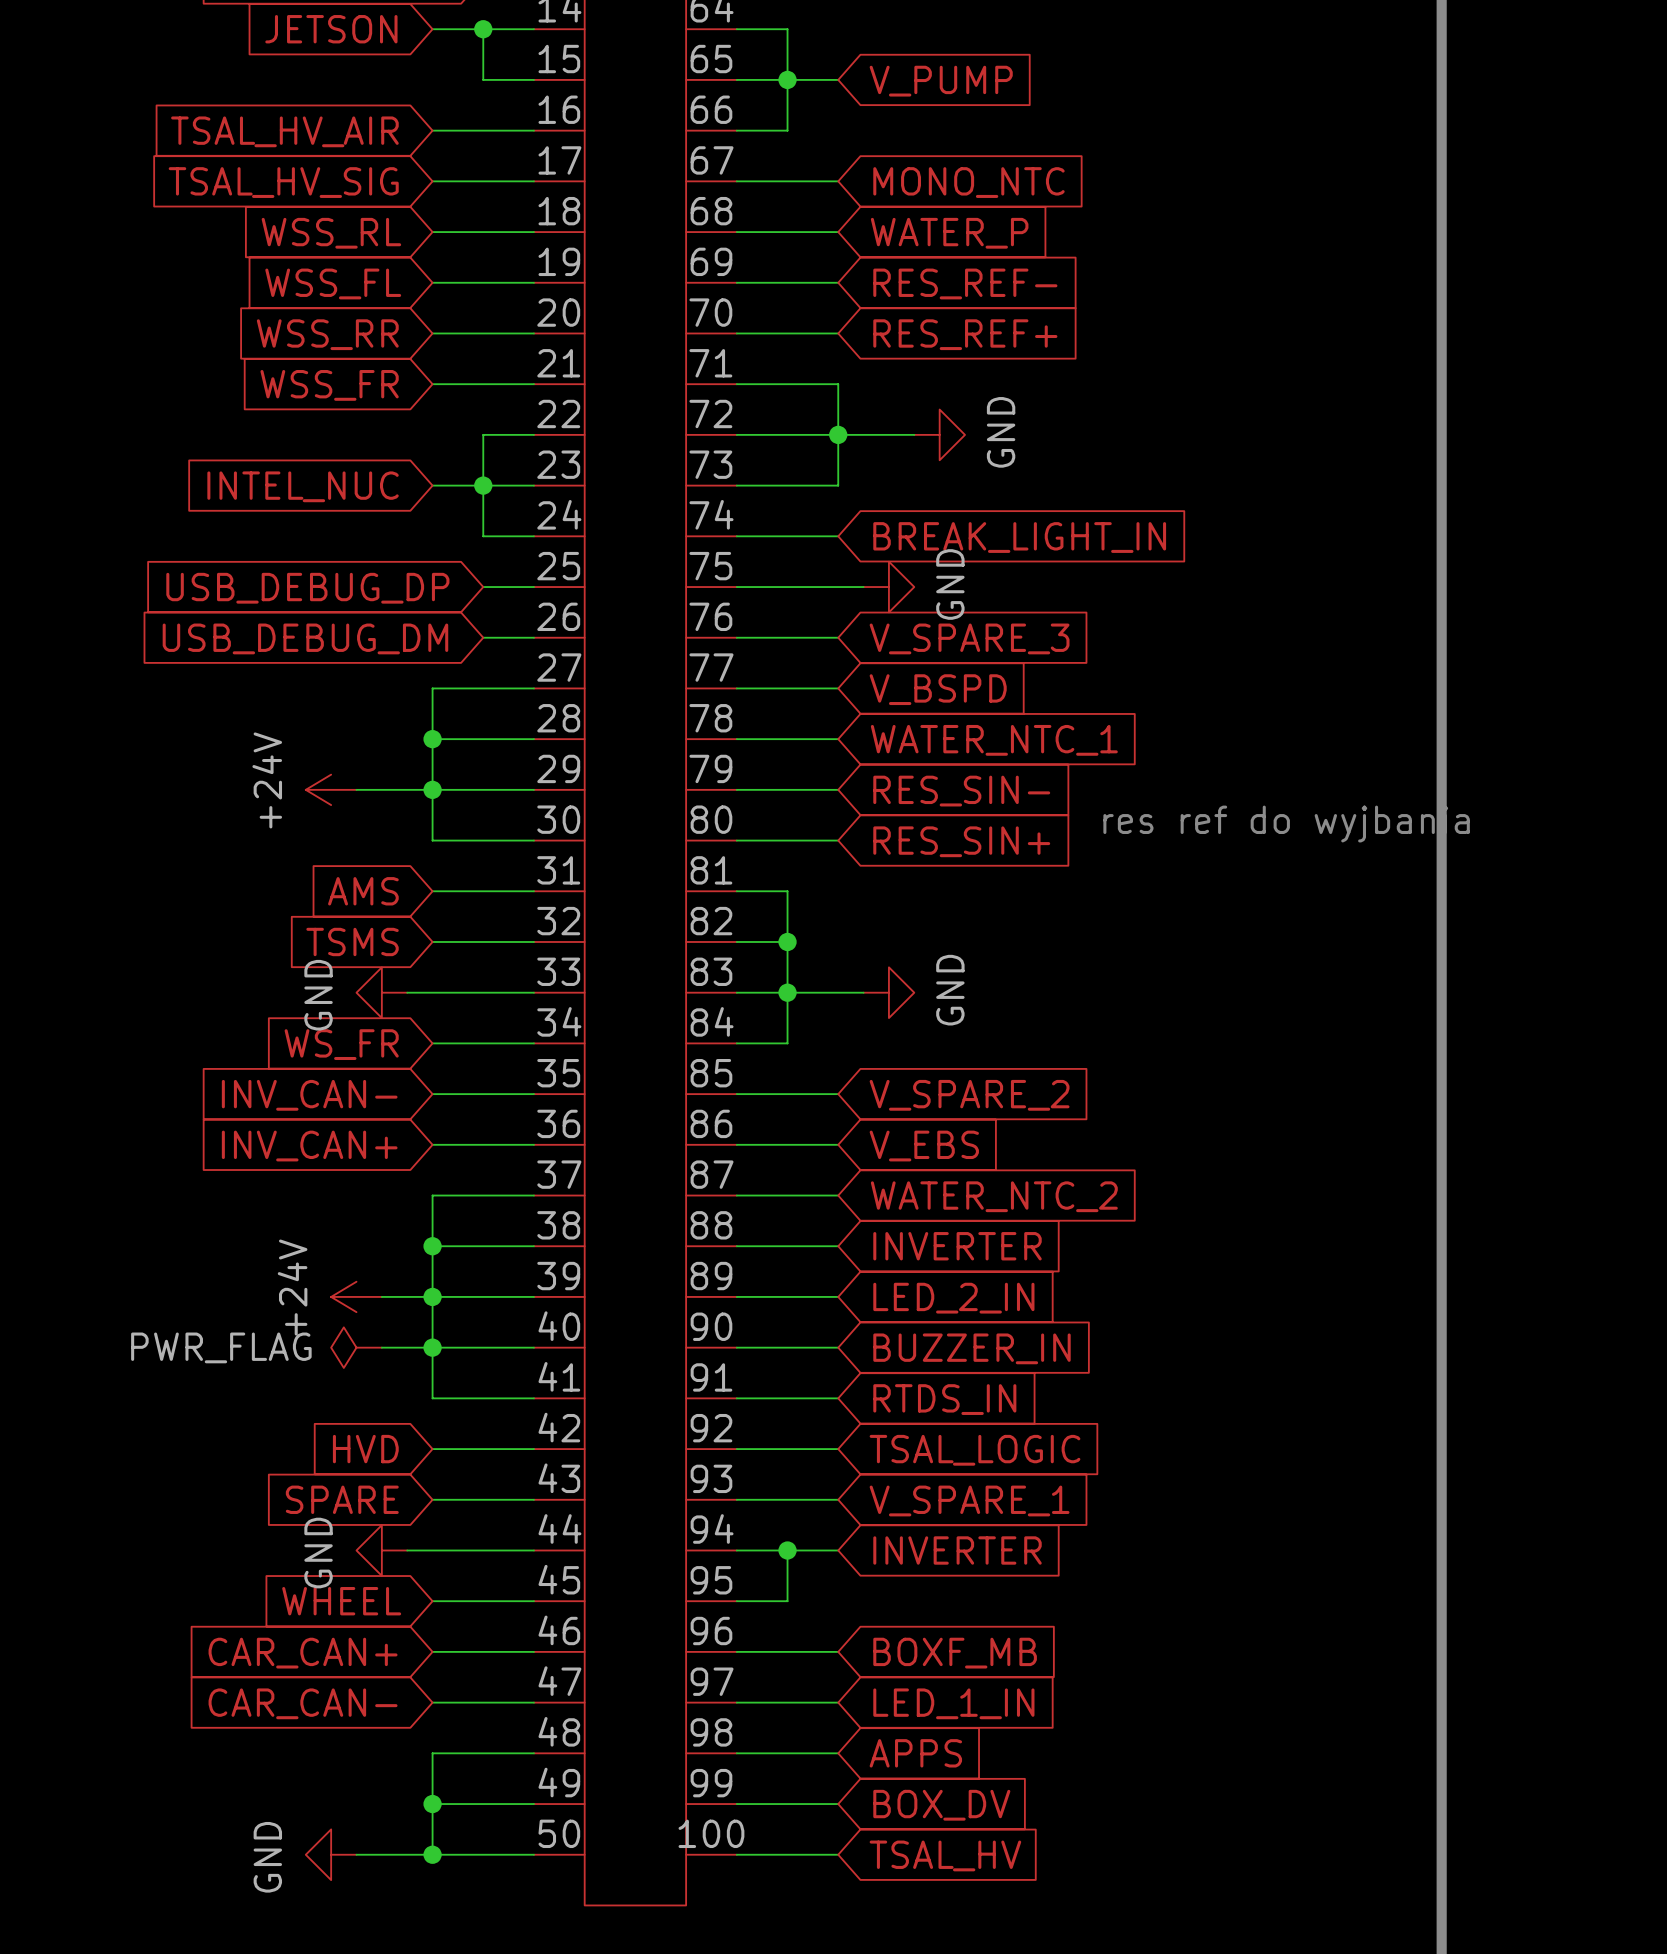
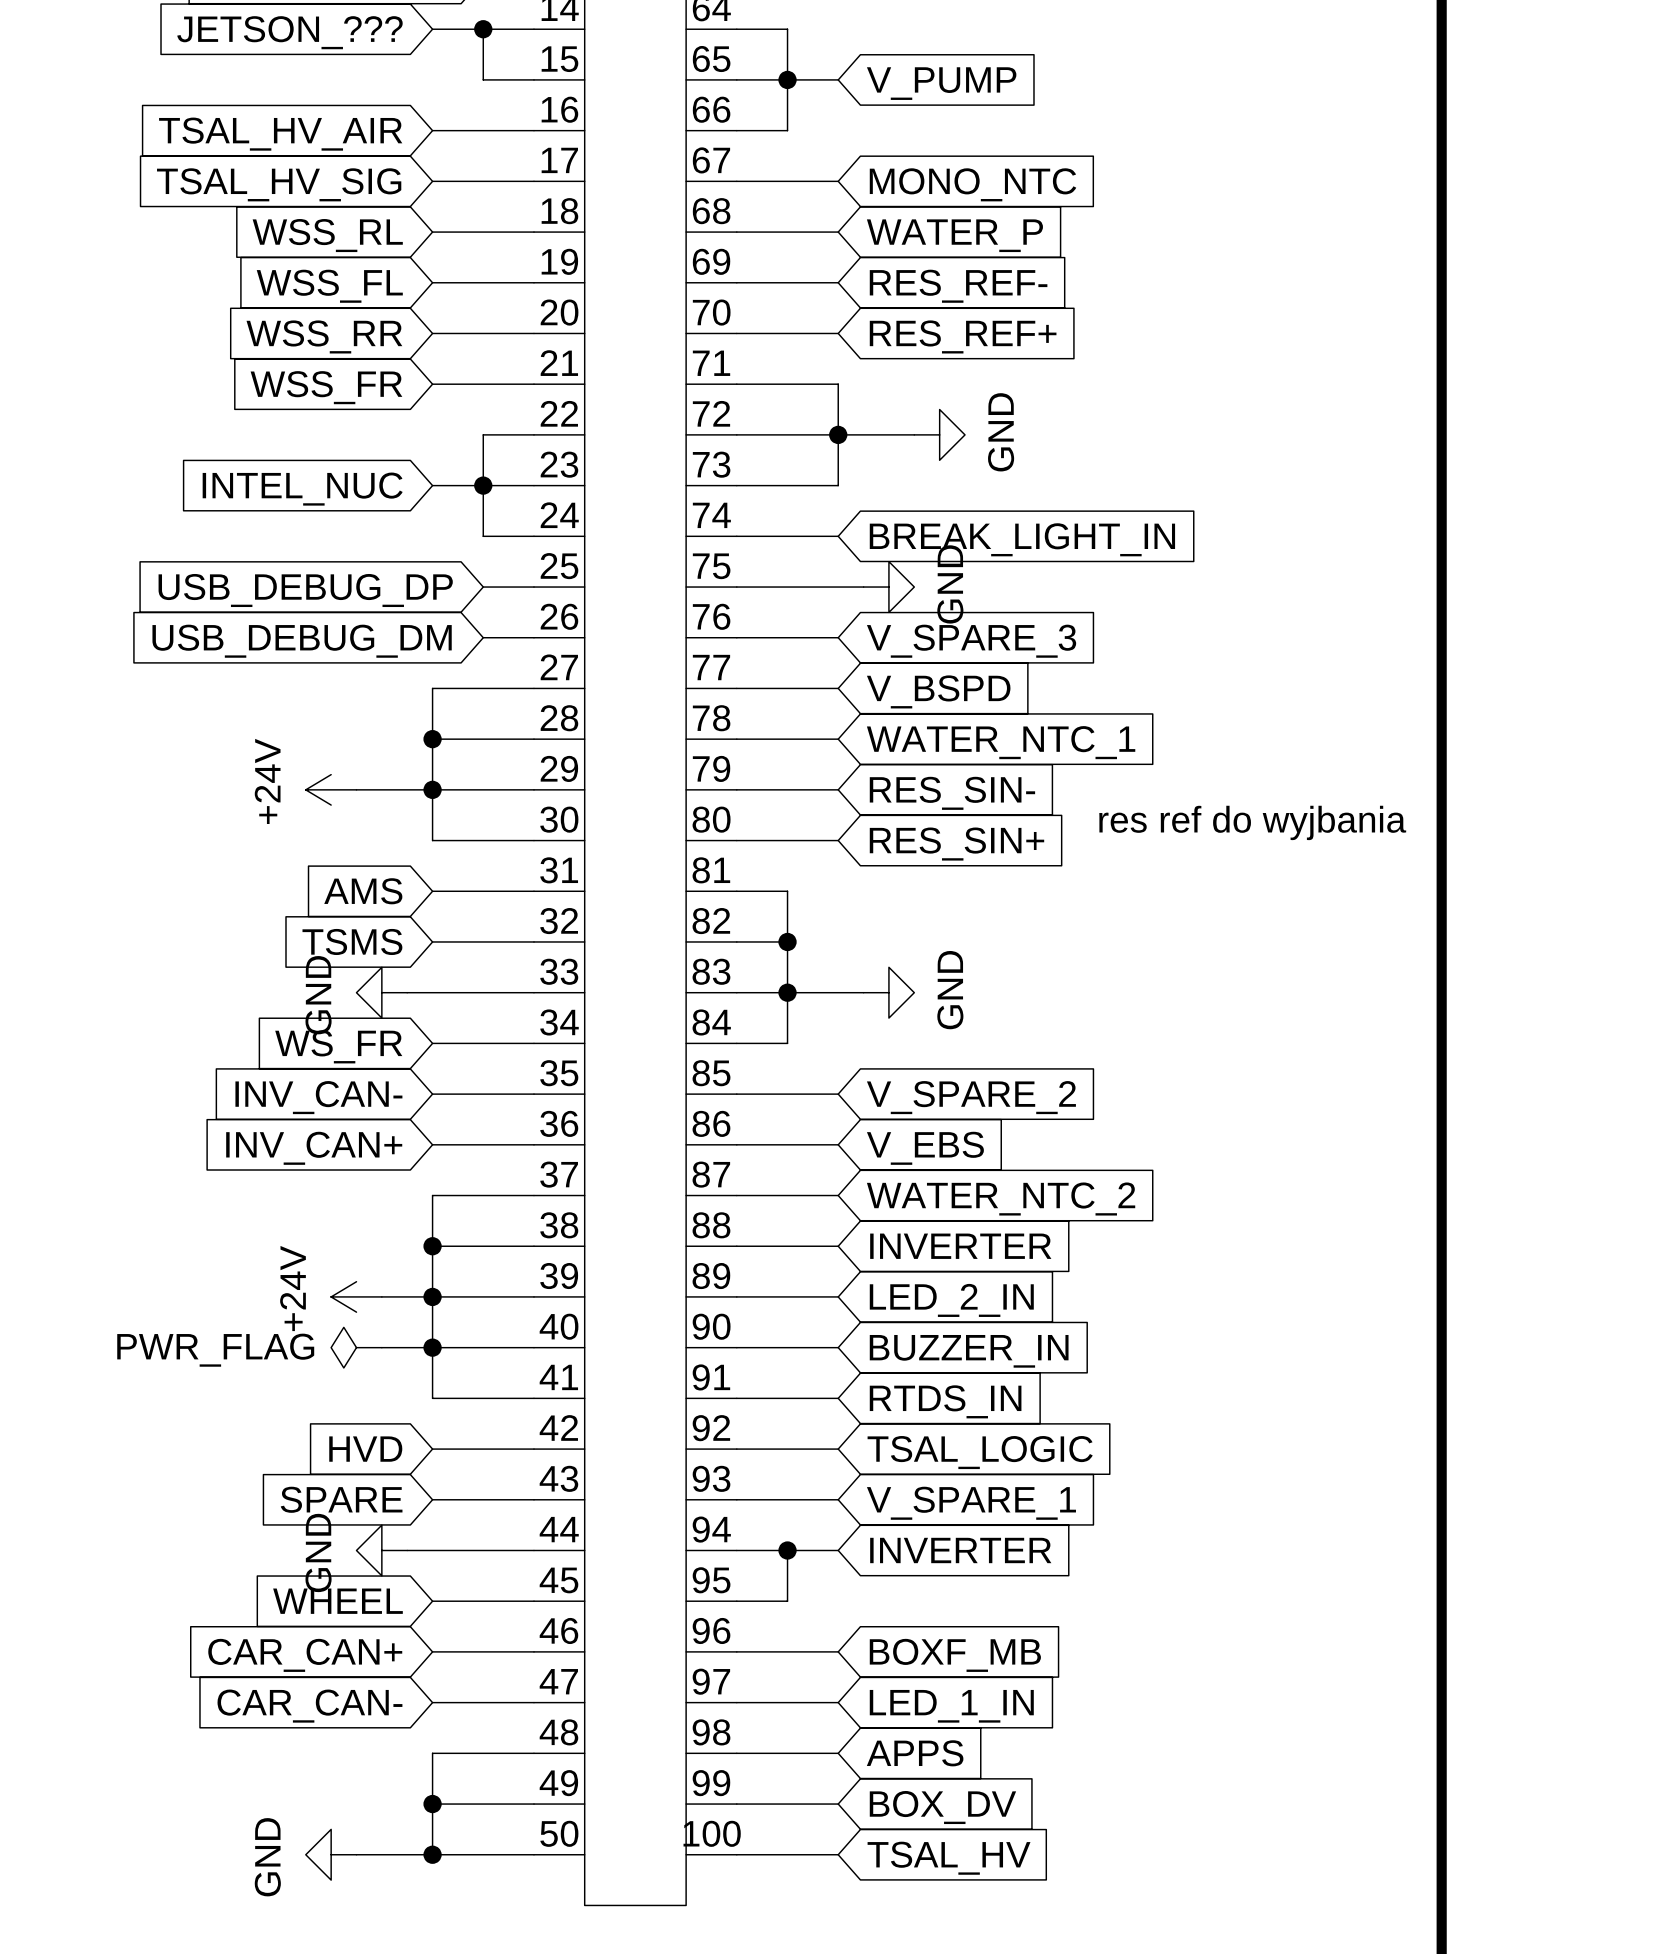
global label: JETSON (331, 29) -> JETSON_??? (289, 32)

